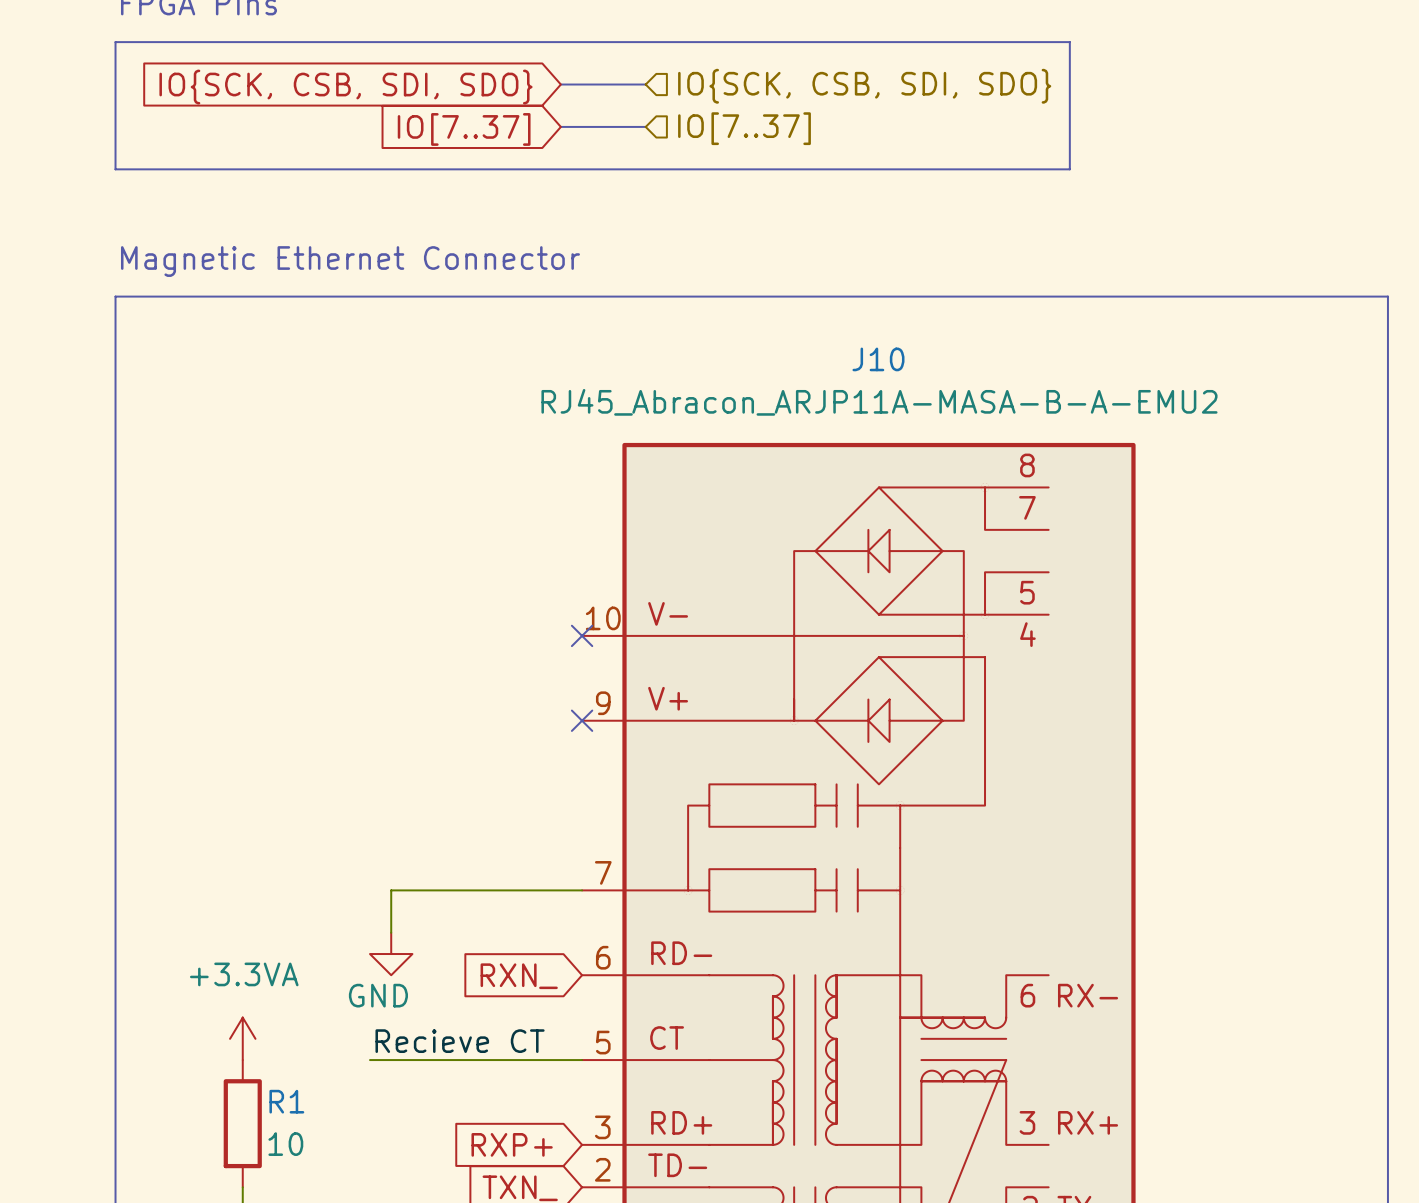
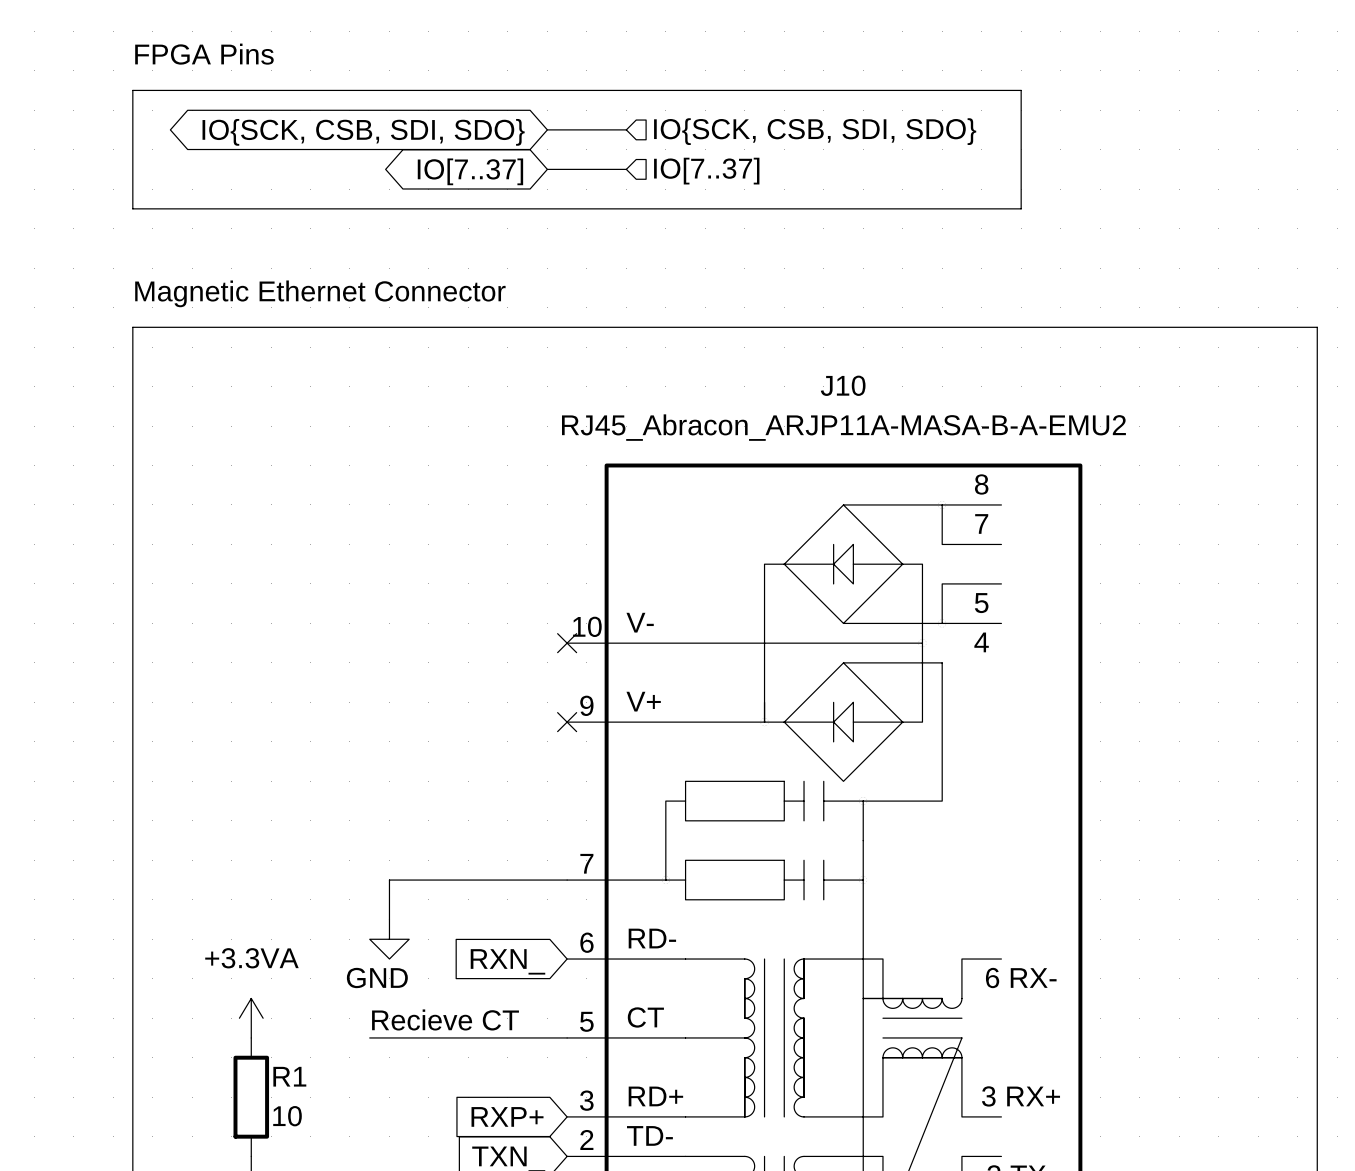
global label shape: input (345, 87) -> bidirectional (363, 132)
global label shape: input (464, 129) -> bidirectional (470, 171)

